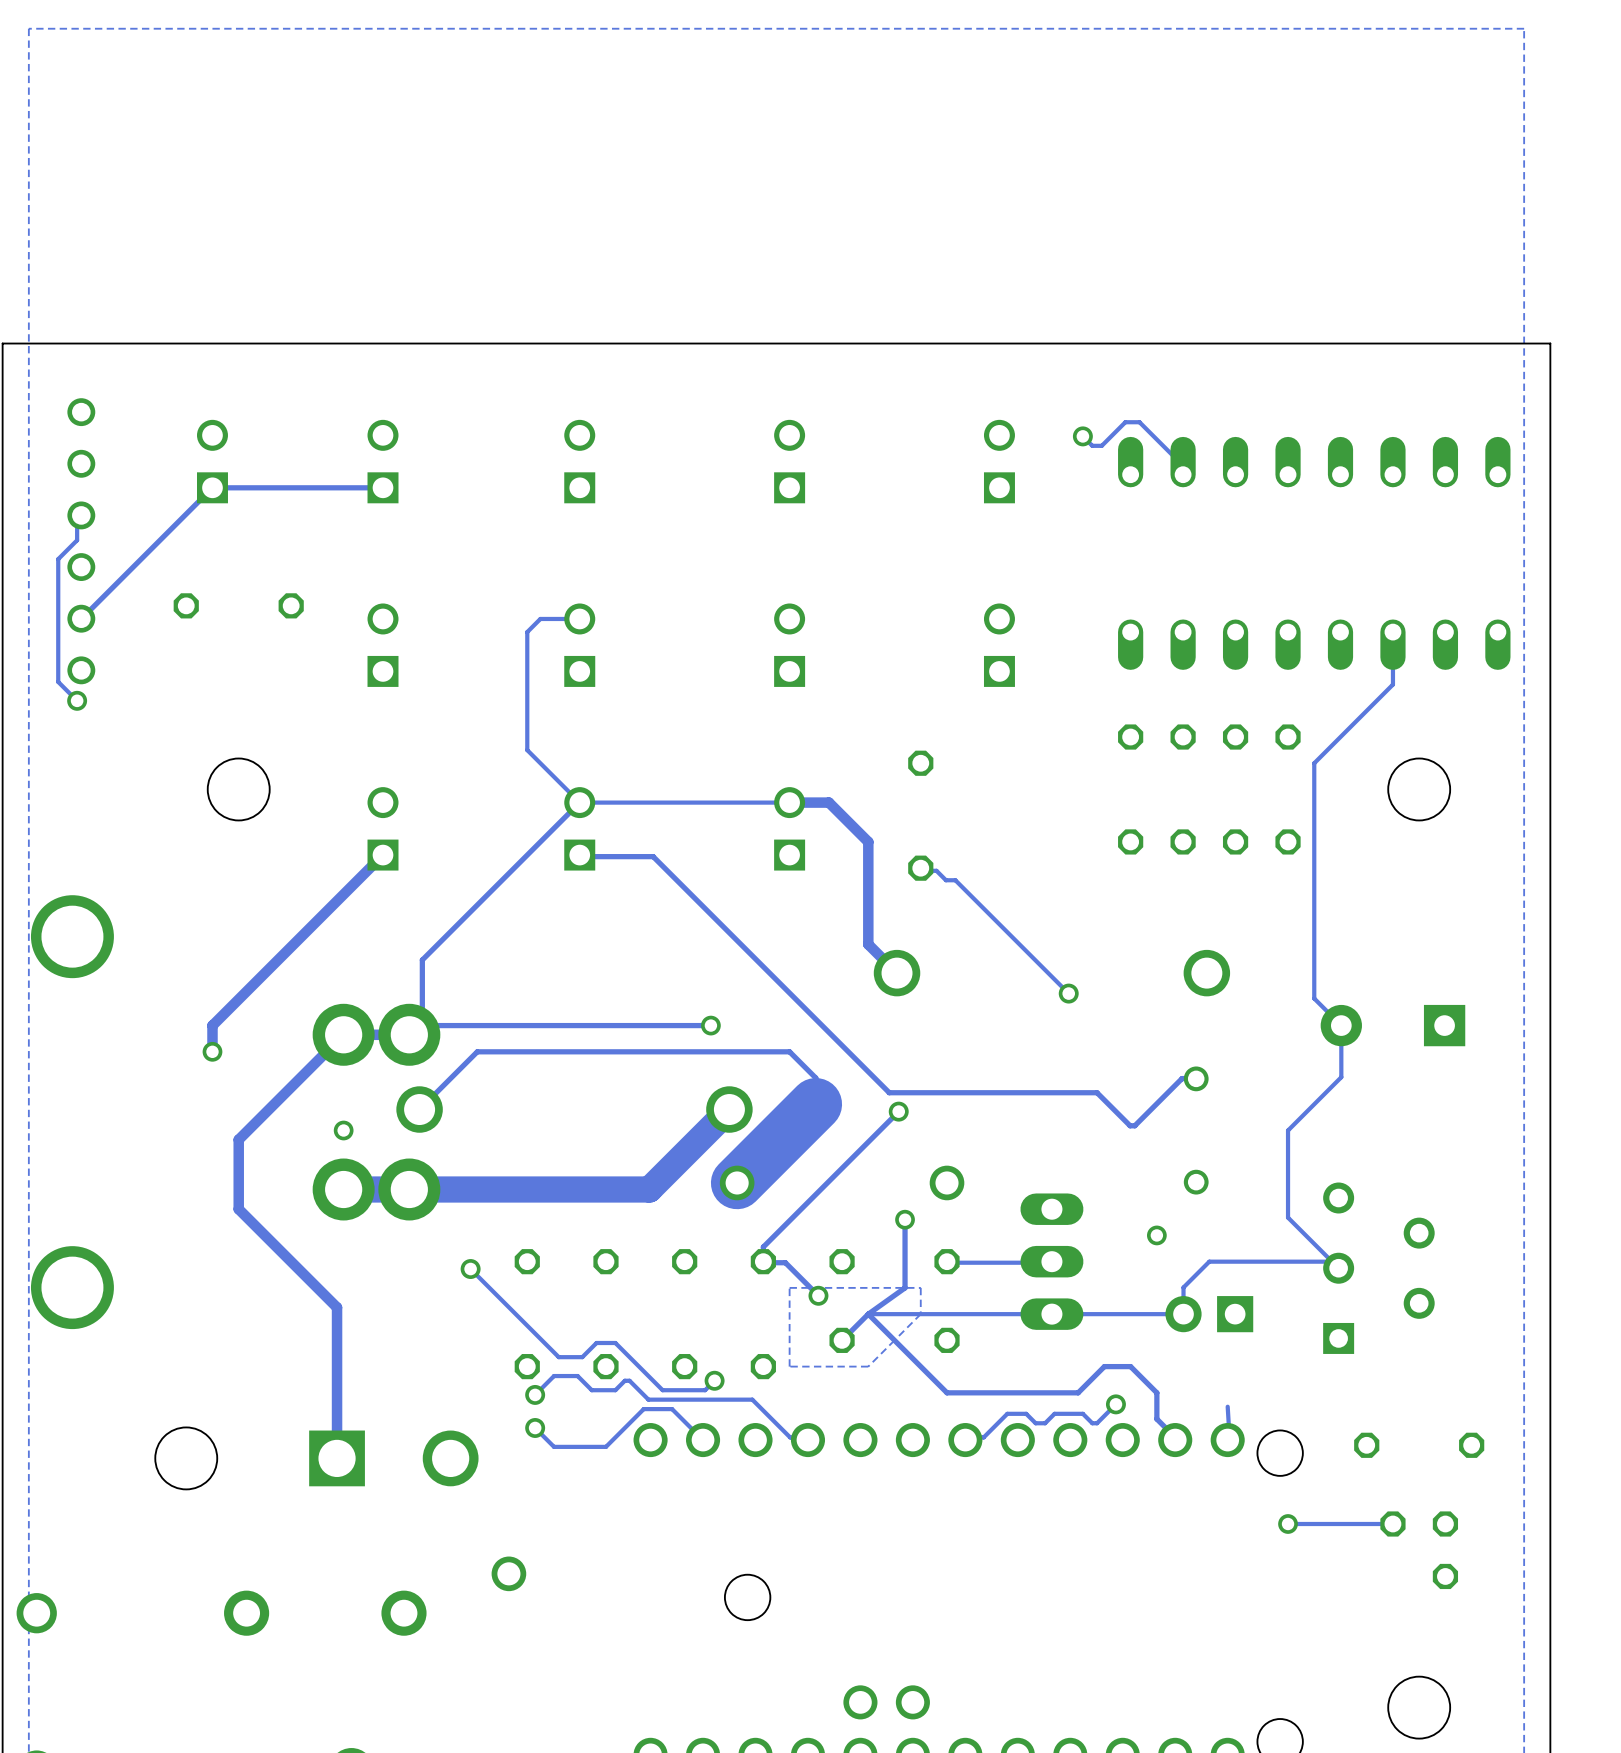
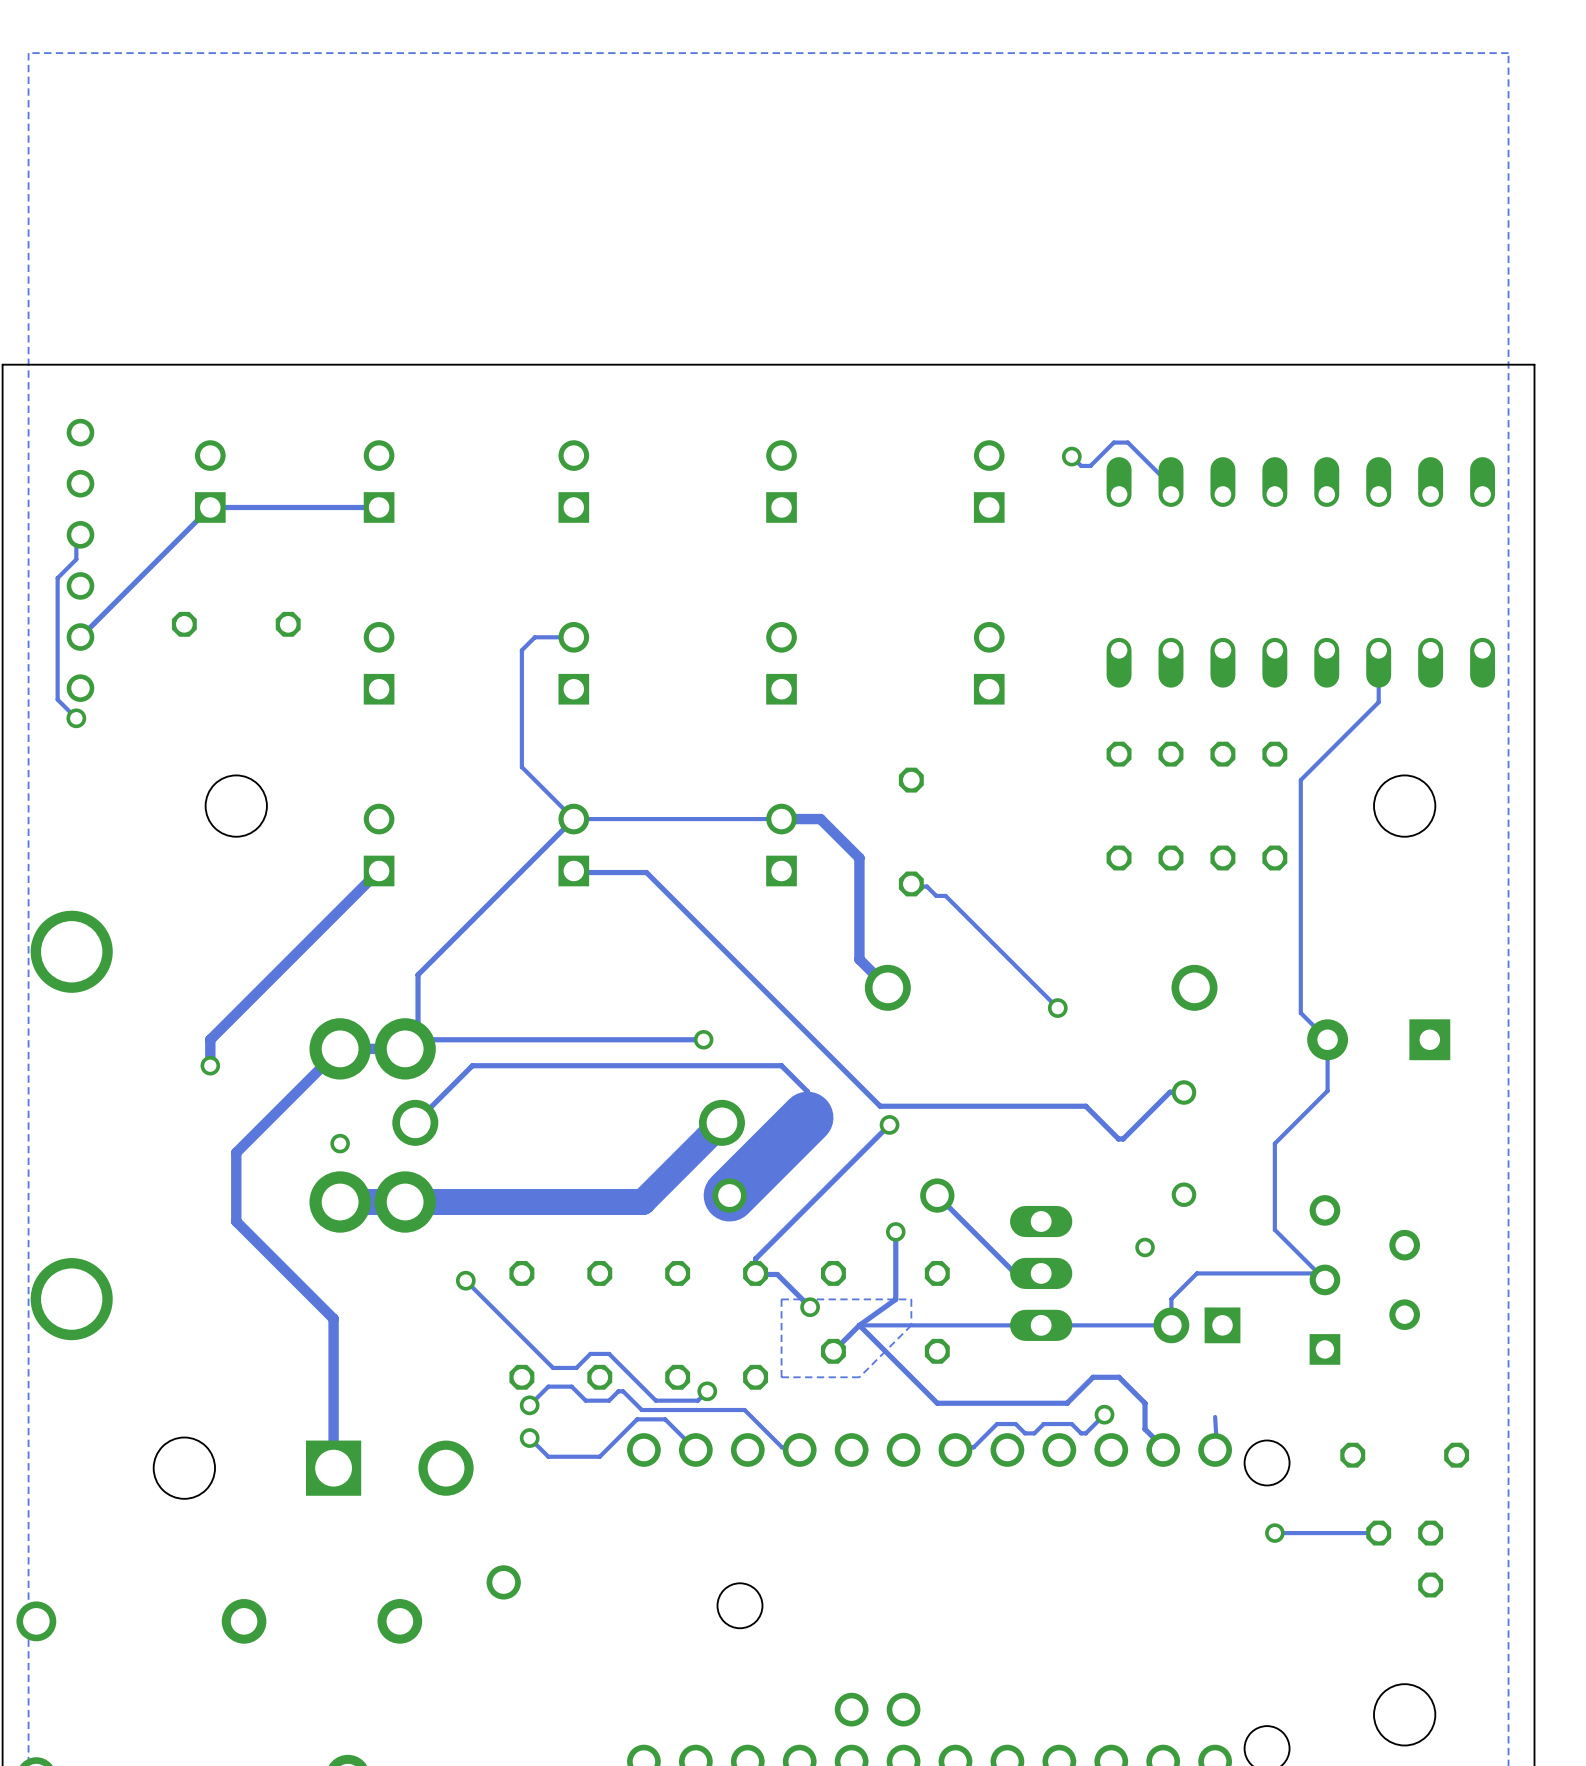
track: (1051, 1261) (947, 1261) -> (1041, 1273) (1015, 1273) (937, 1195)

